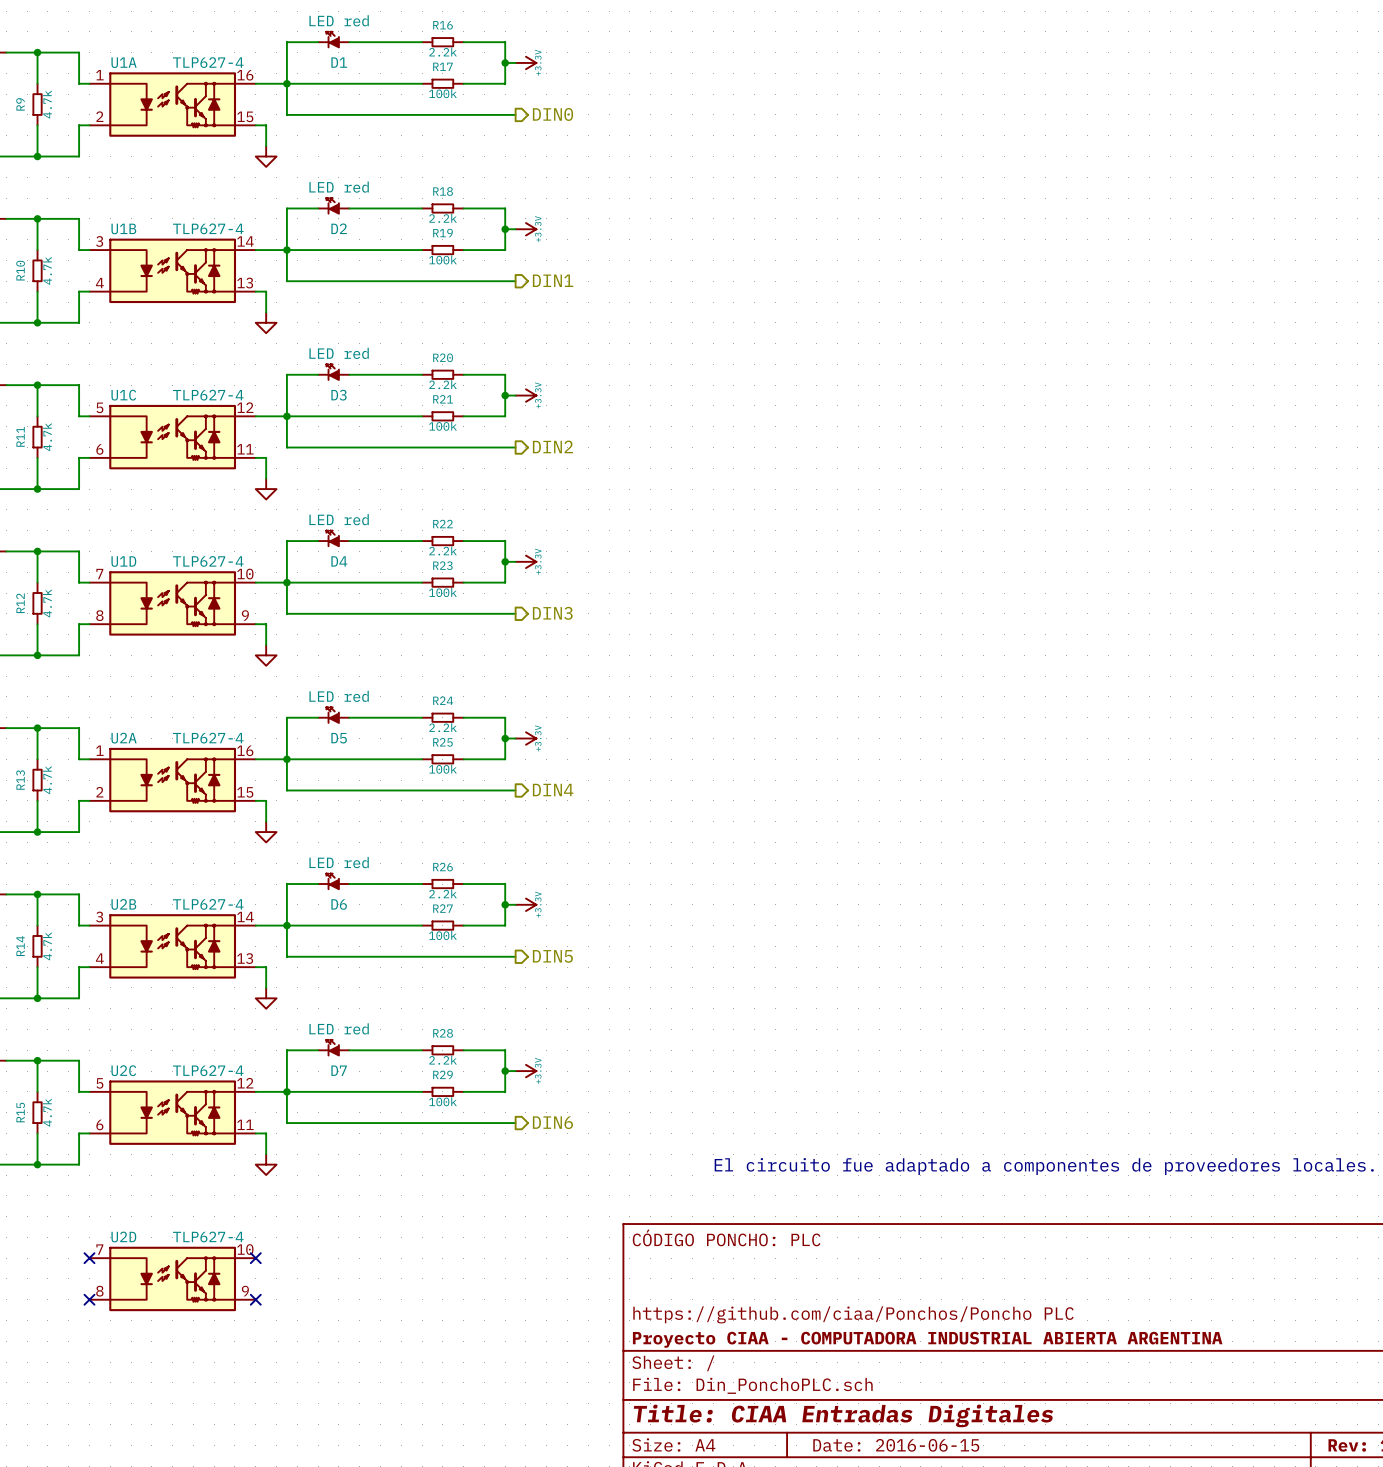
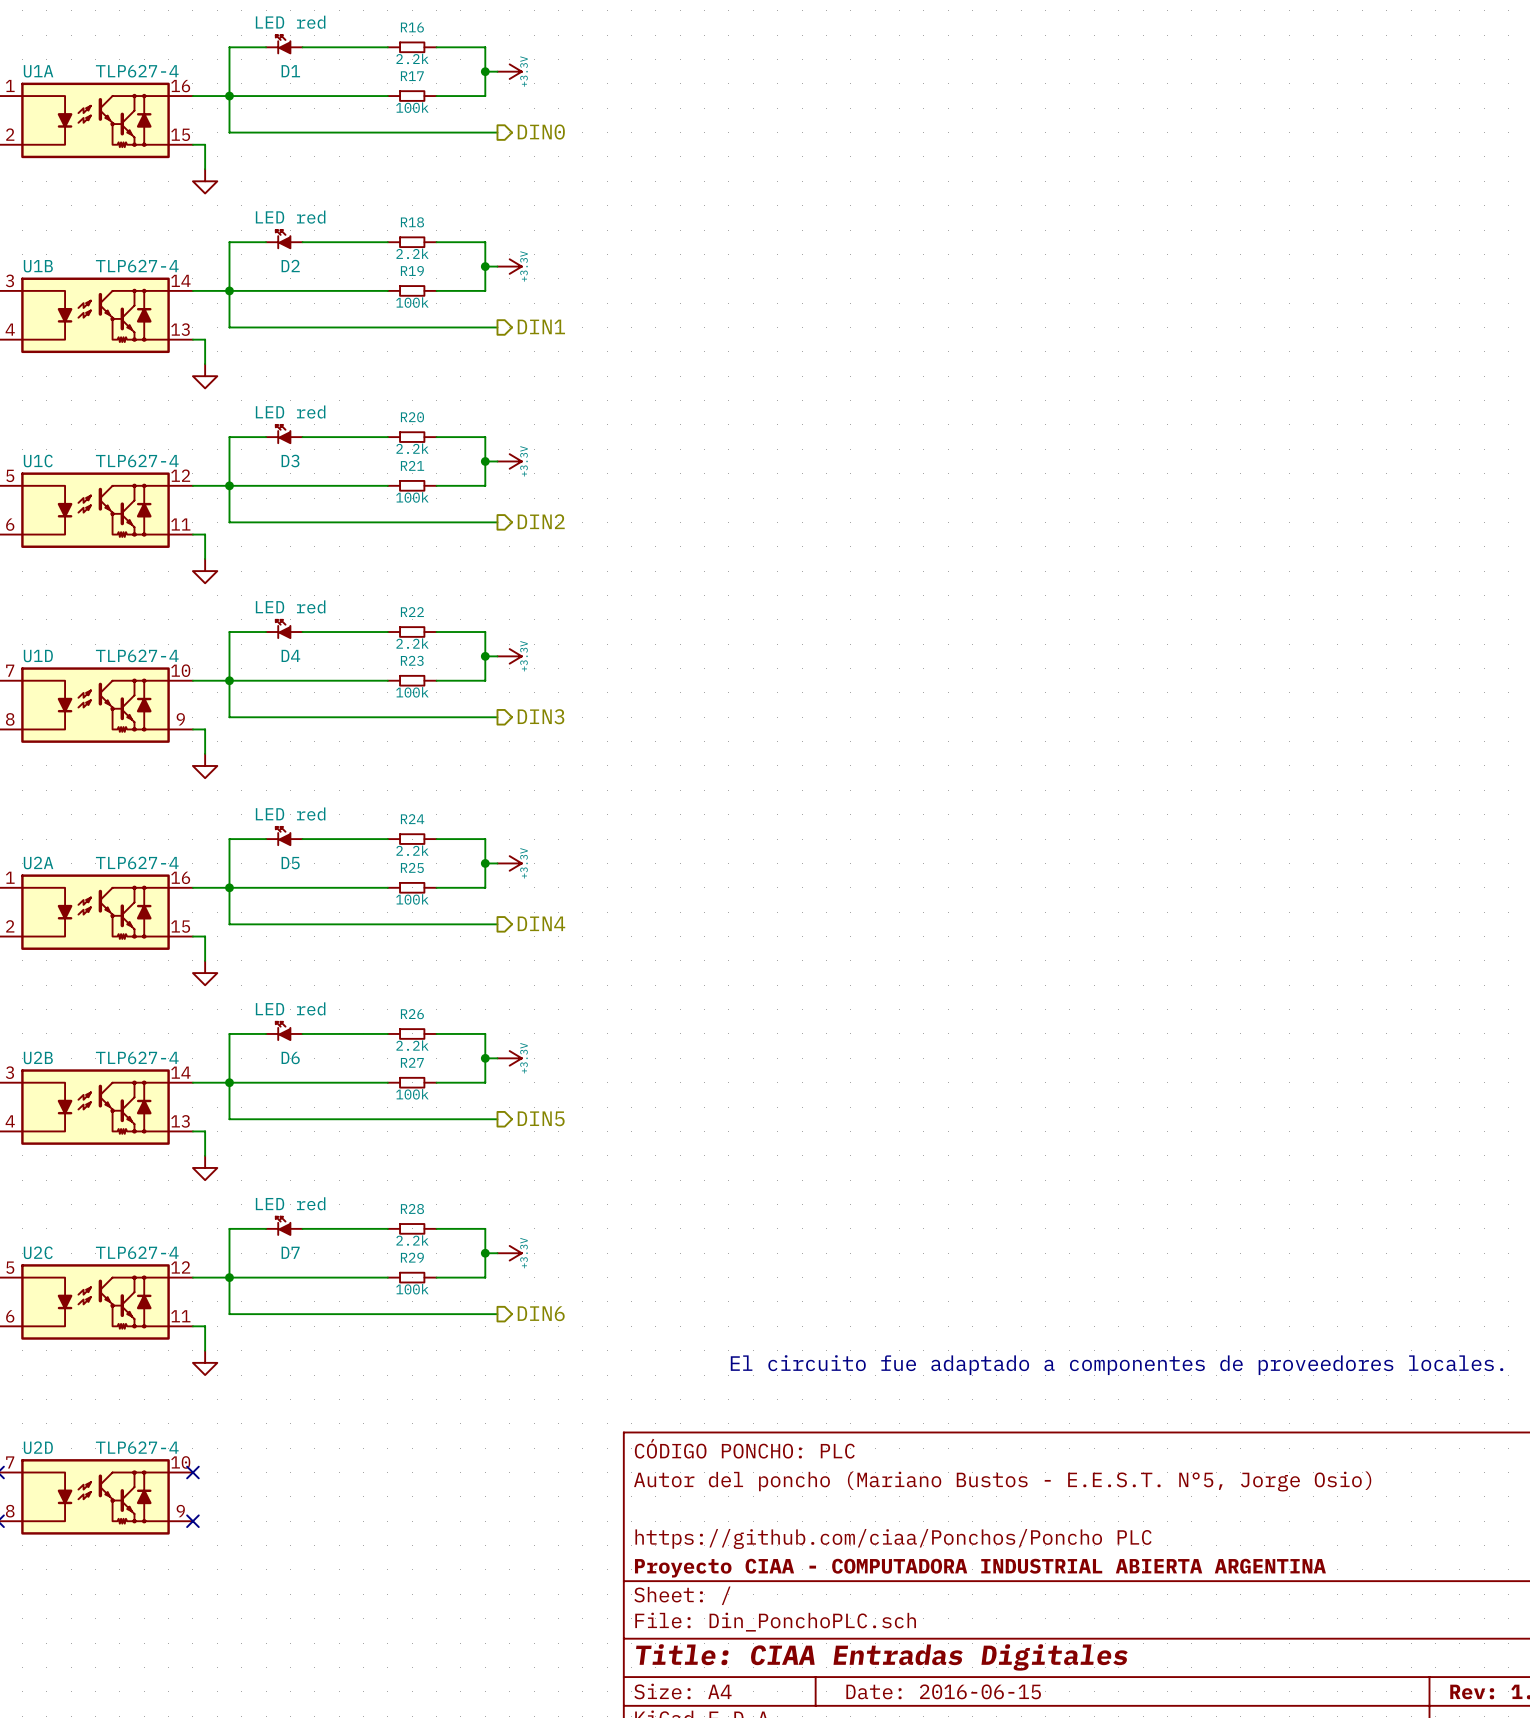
title block: none -> Autor del poncho (Mariano Bustos - E.E.S.T. N°5, Jorge Osio) (1002, 1481)

